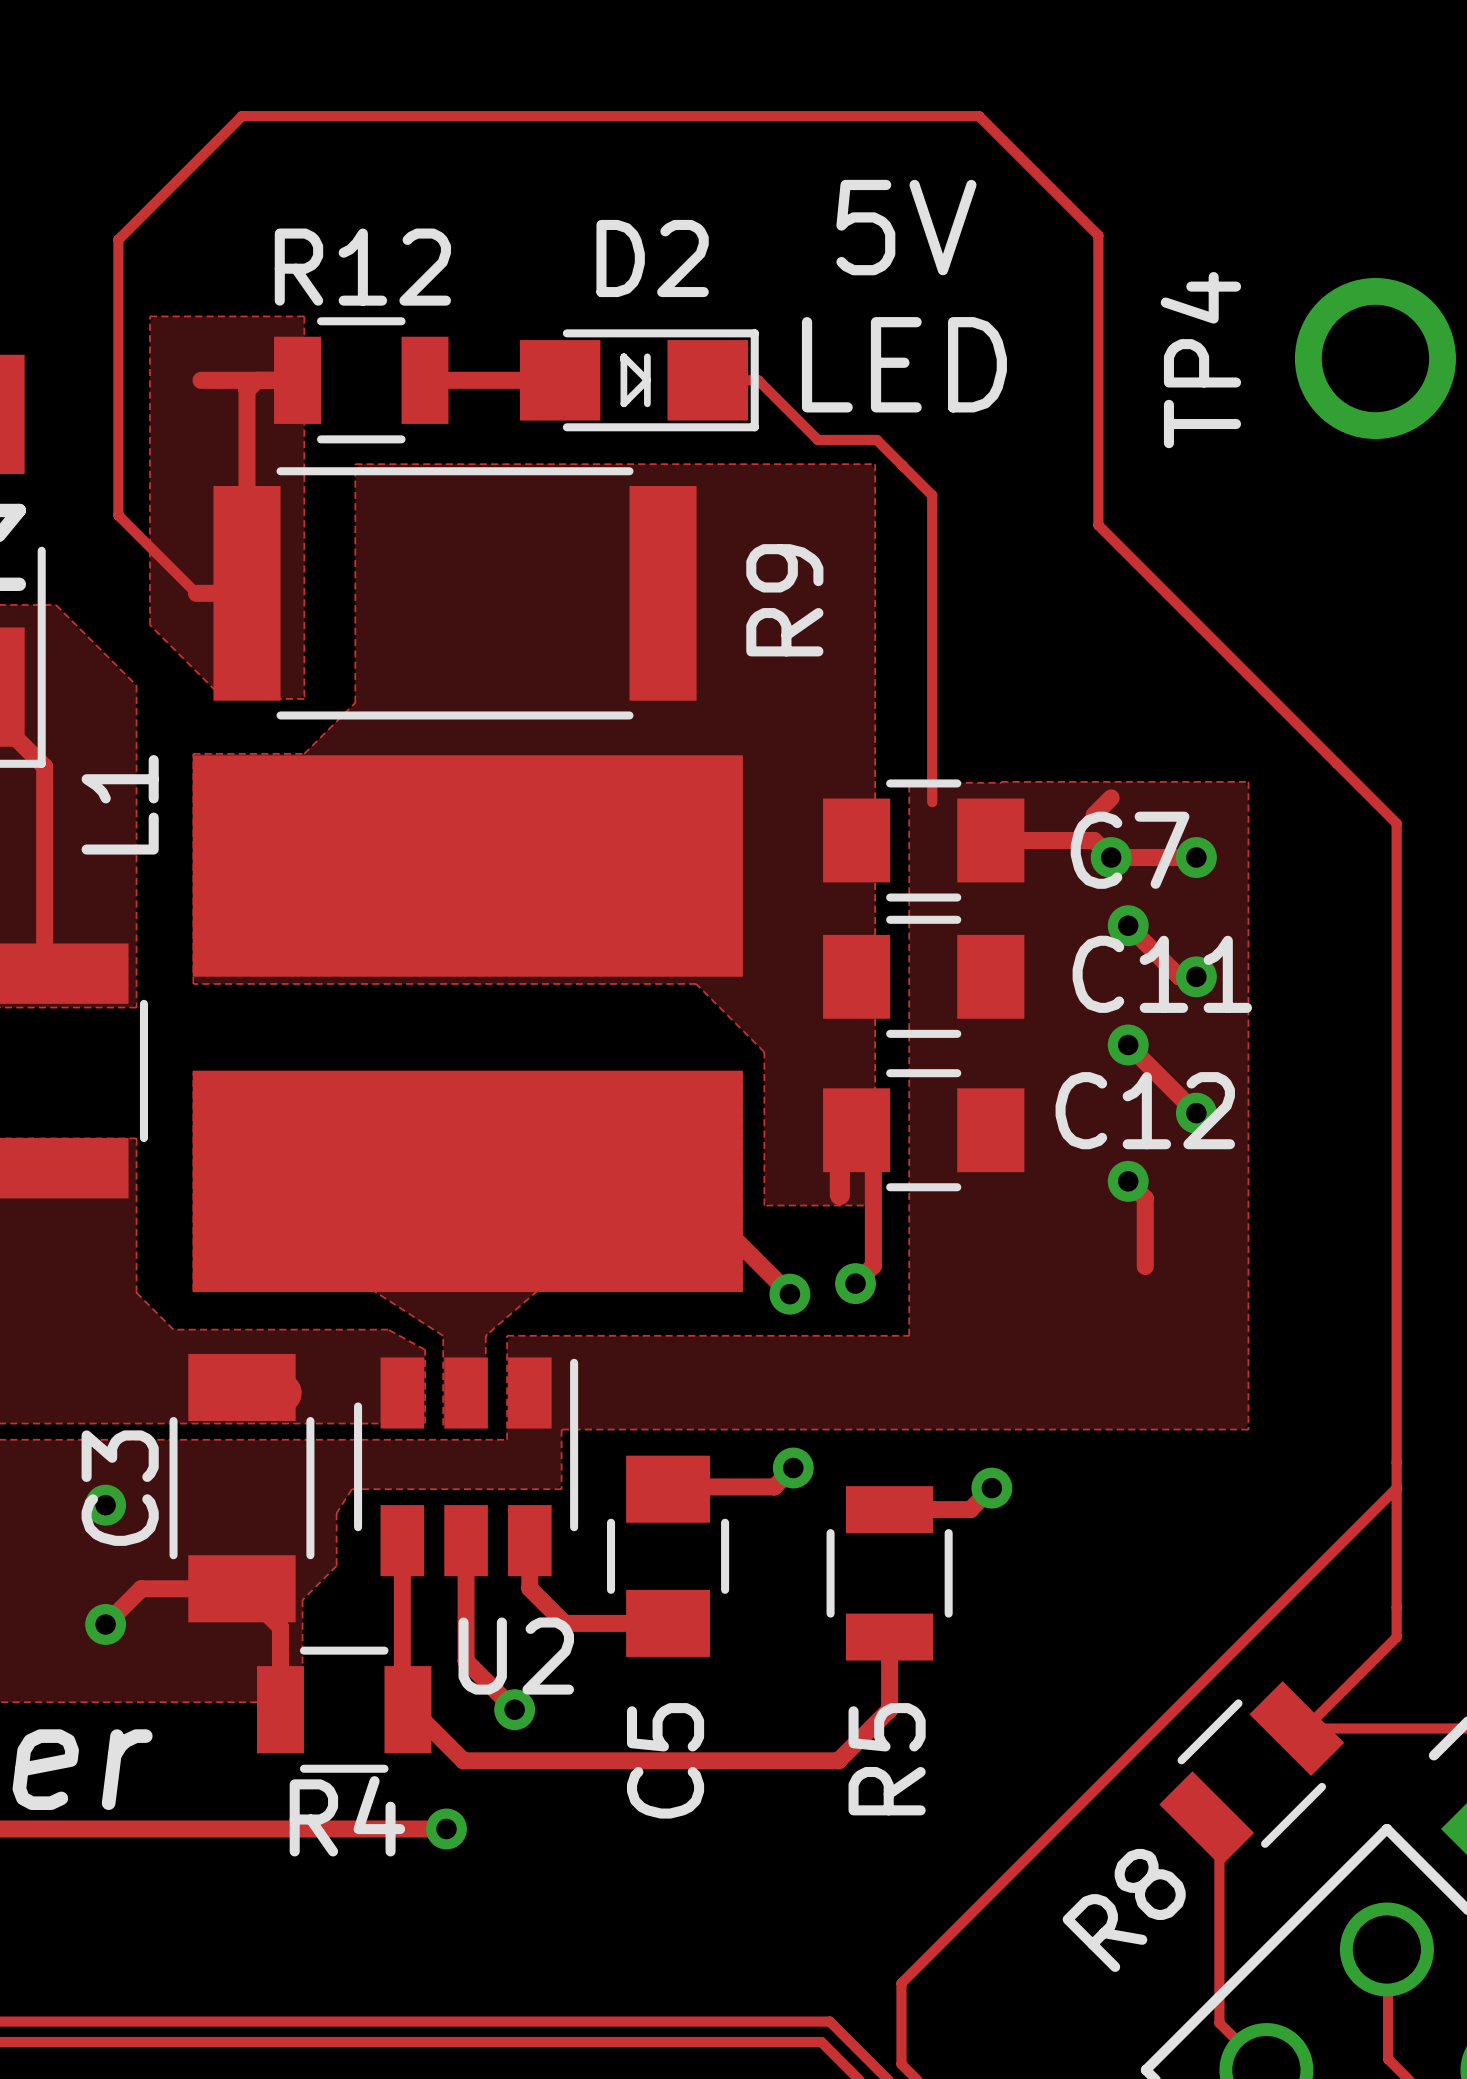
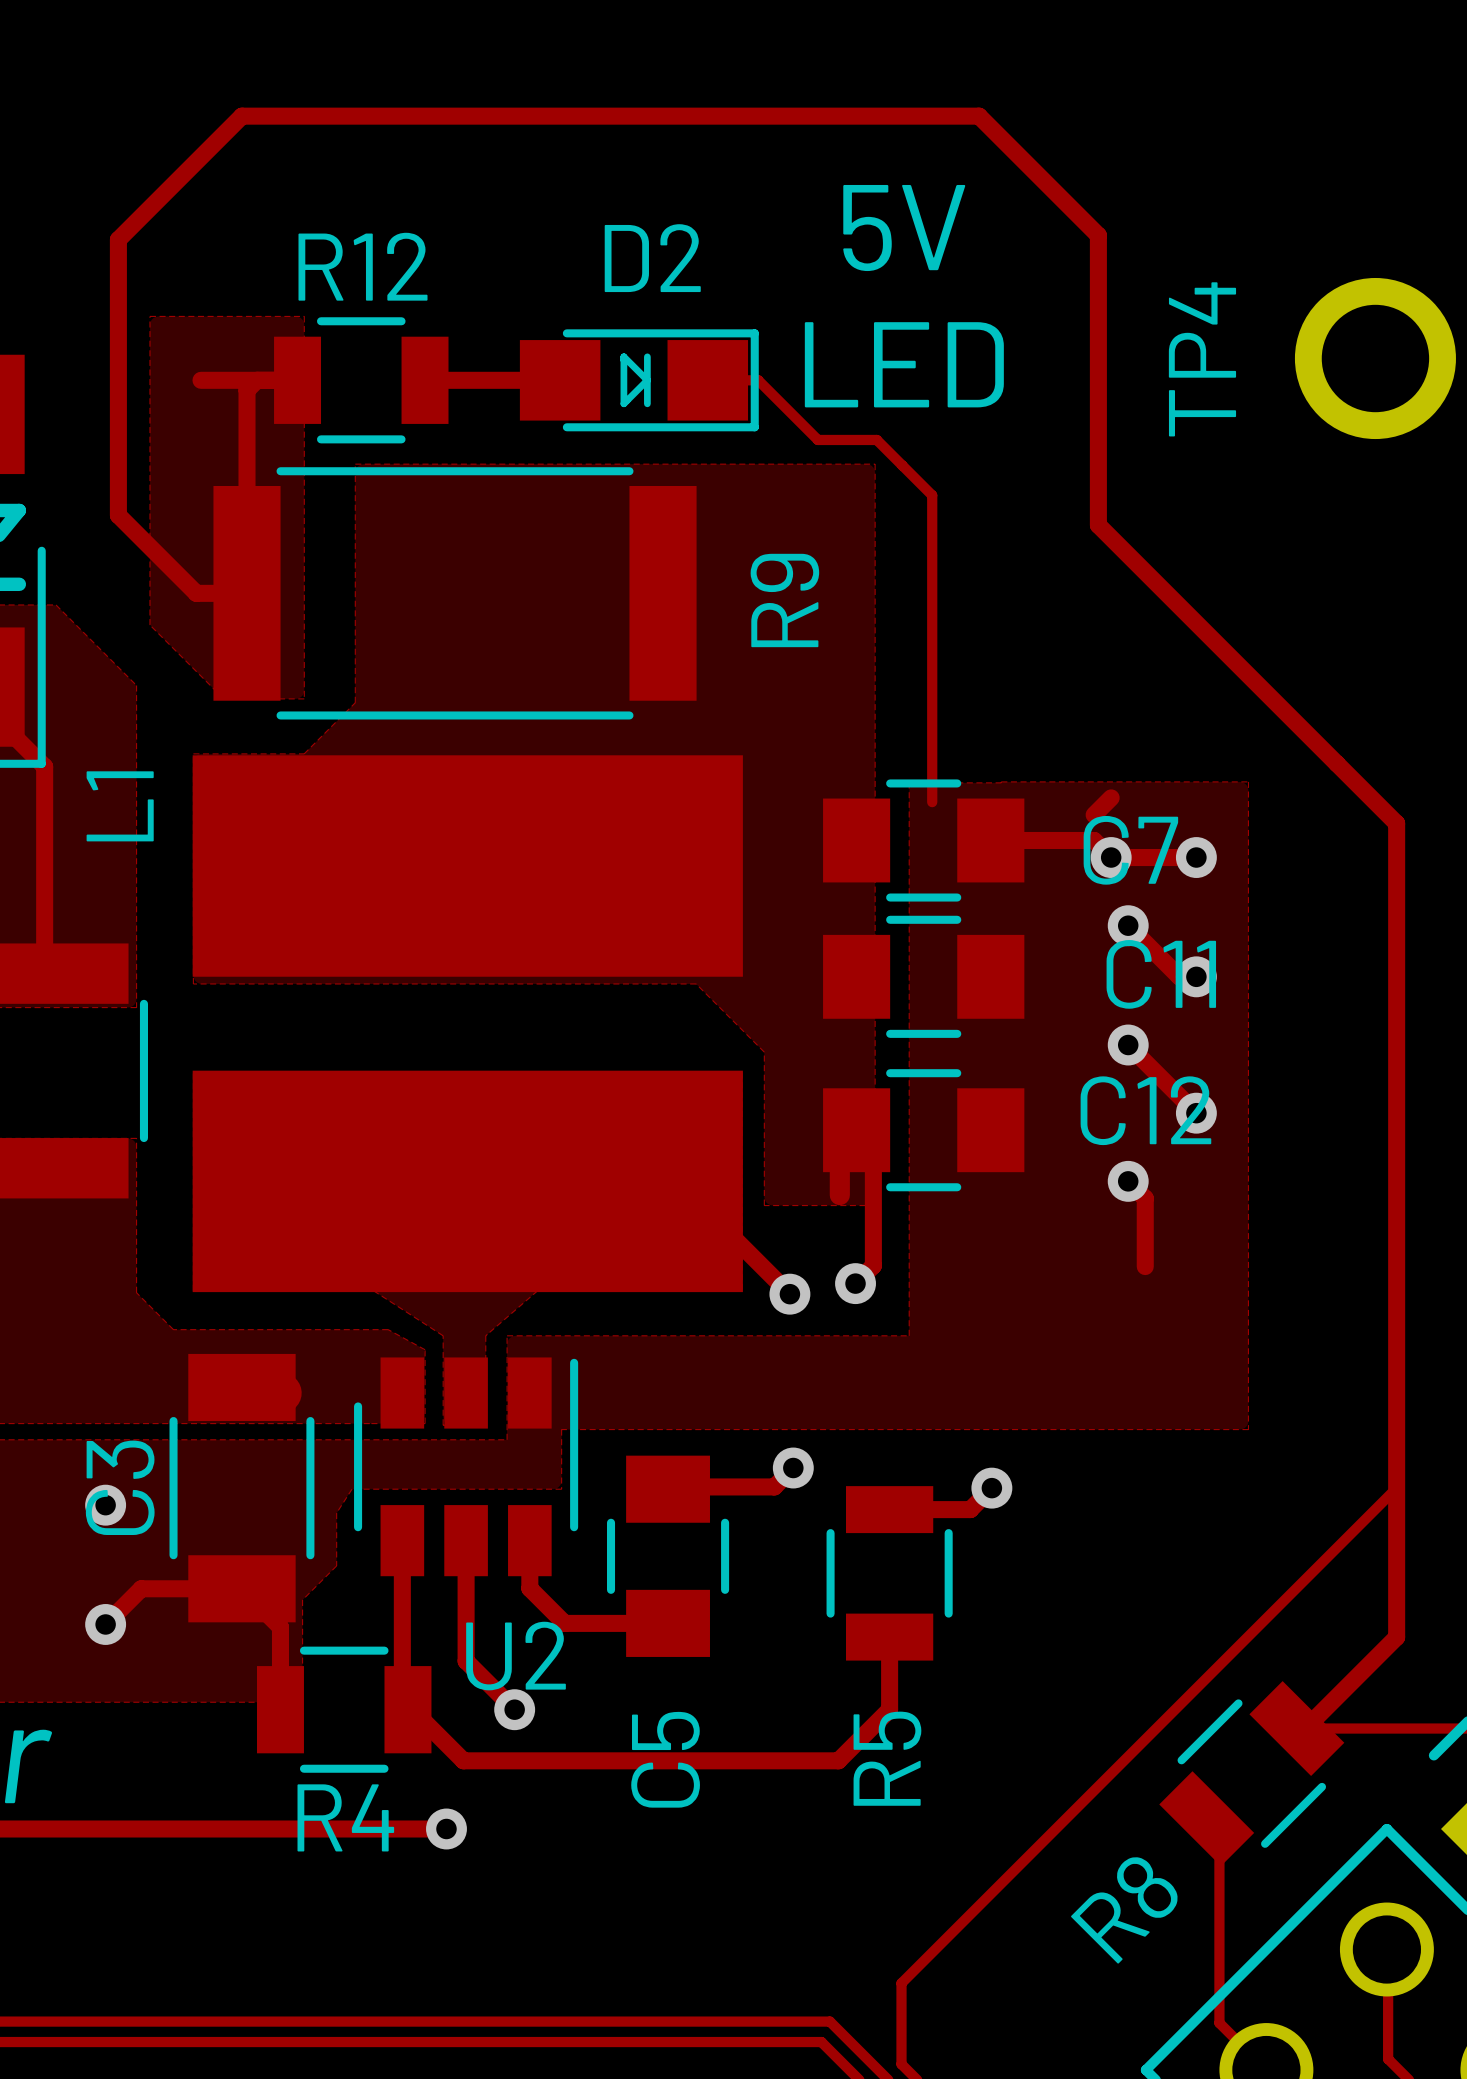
track width: thin (196, 593) (118, 515) (118, 239) (241, 116) (979, 116) (1098, 235) (1098, 525) (1396, 823) (1396, 1637) (1307, 1726) -> thick (196, 593) (118, 515) (118, 239) (241, 116) (979, 116) (1098, 235) (1098, 525) (1396, 823) (1396, 1637) (1307, 1726)

